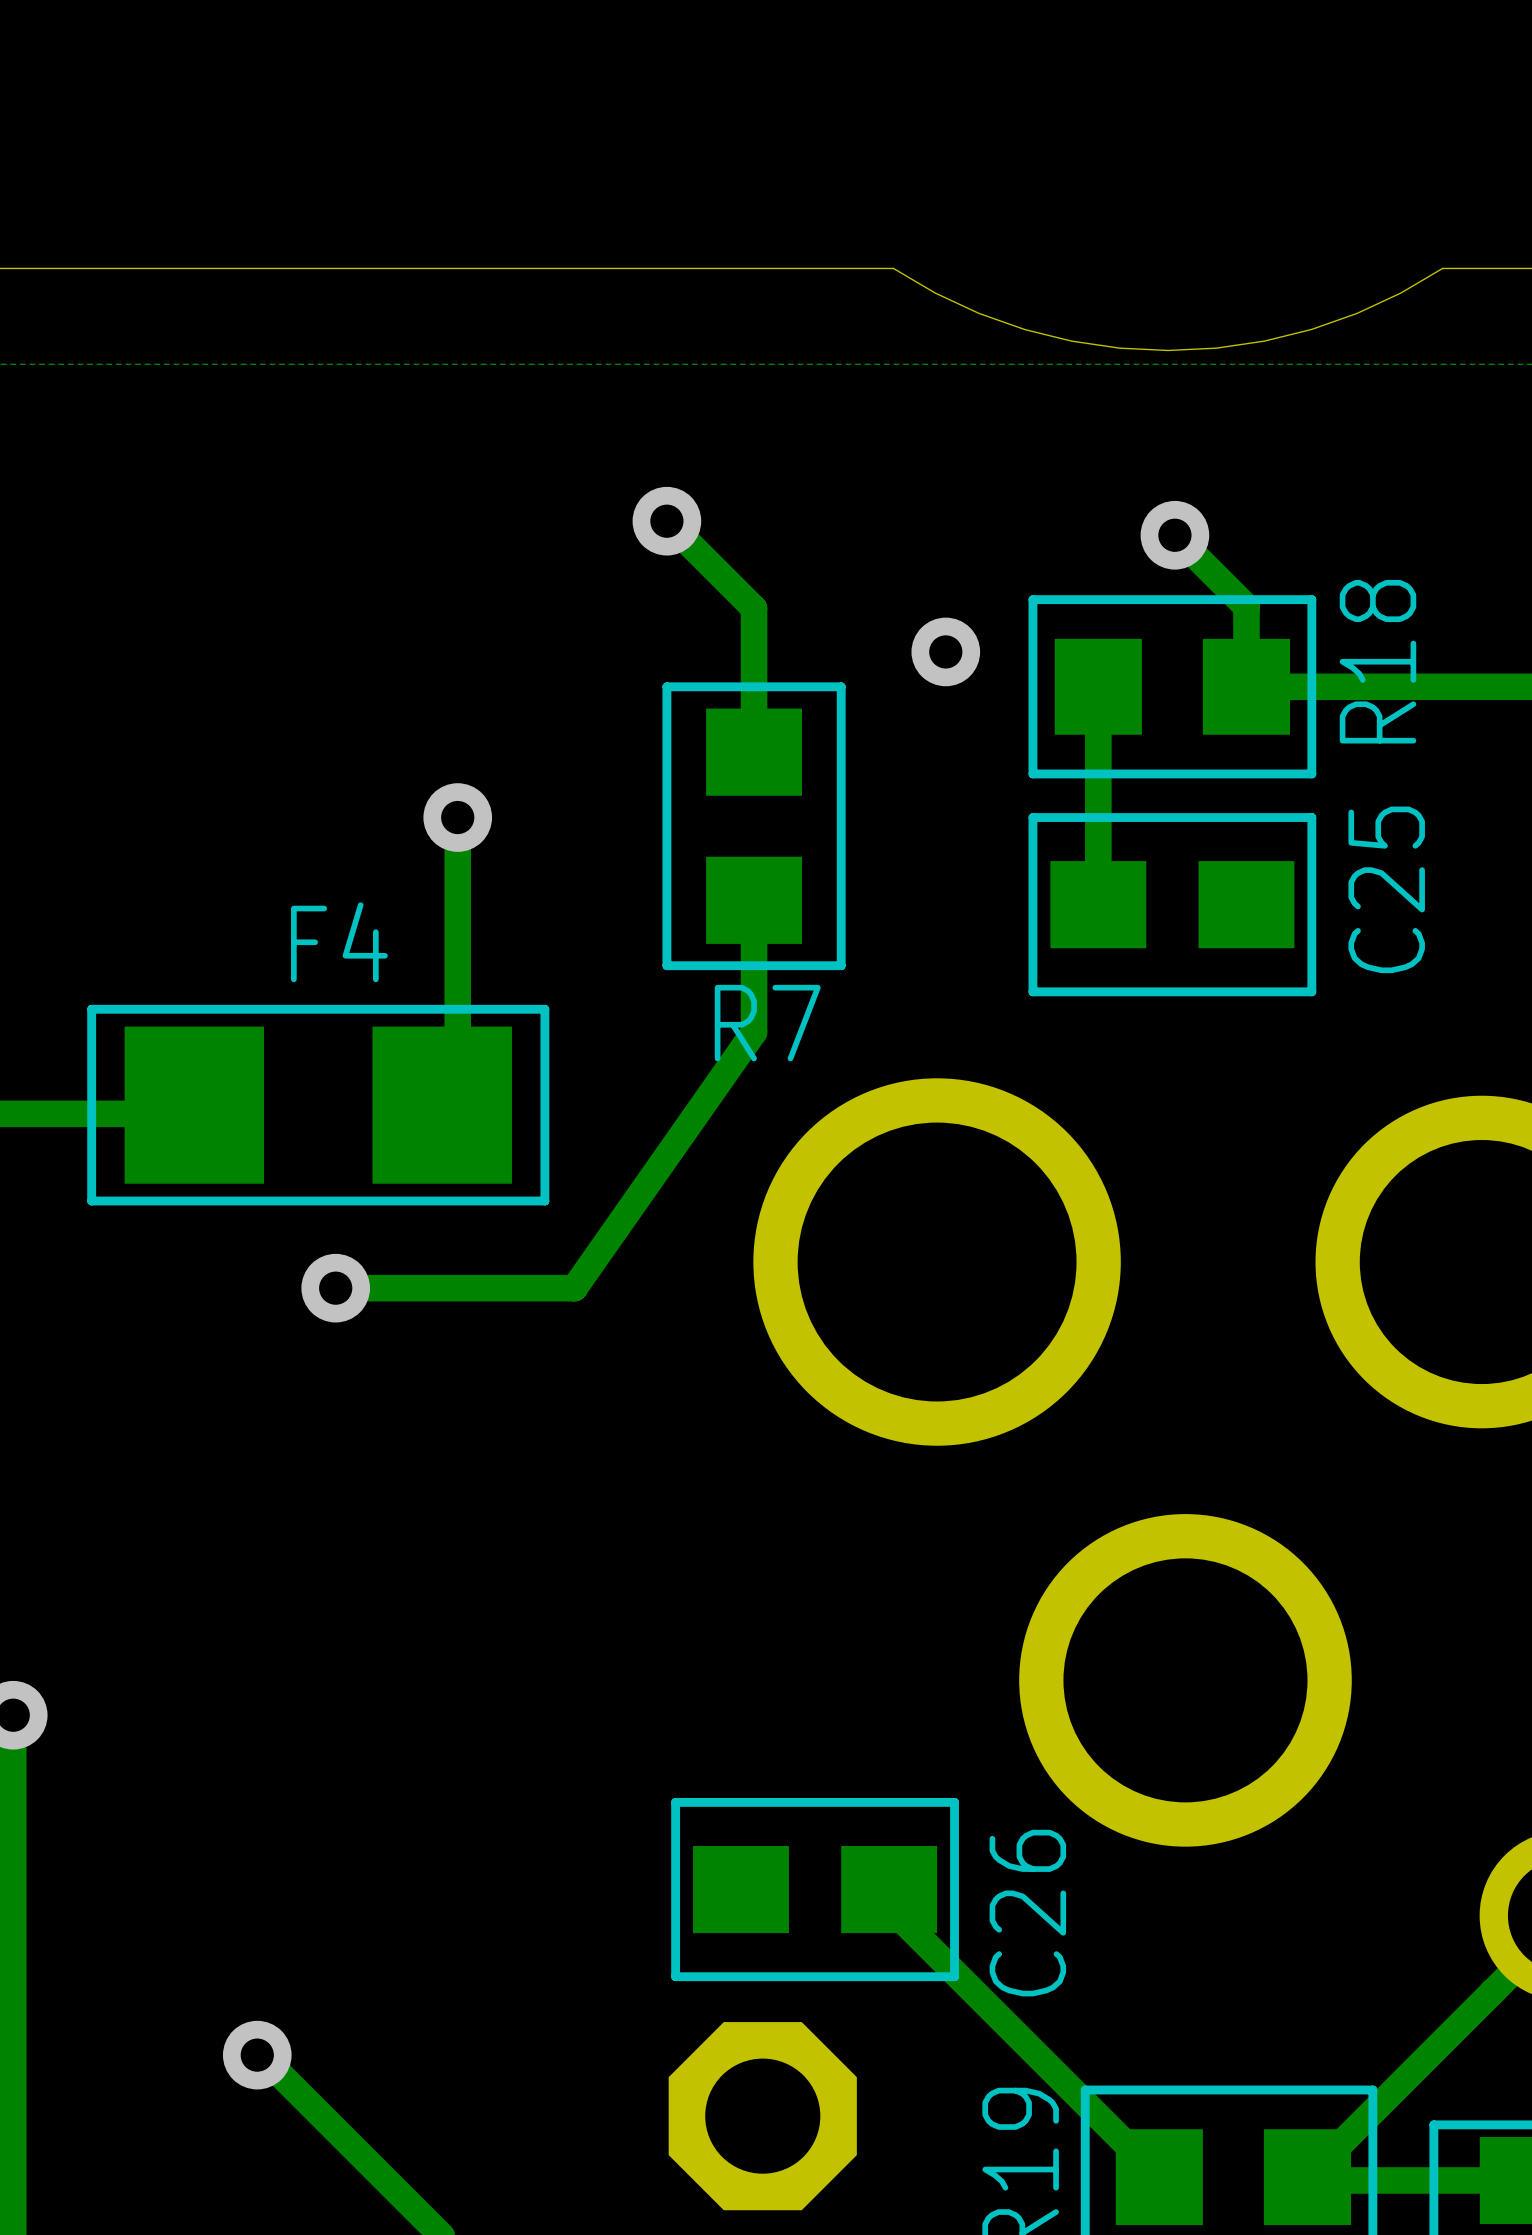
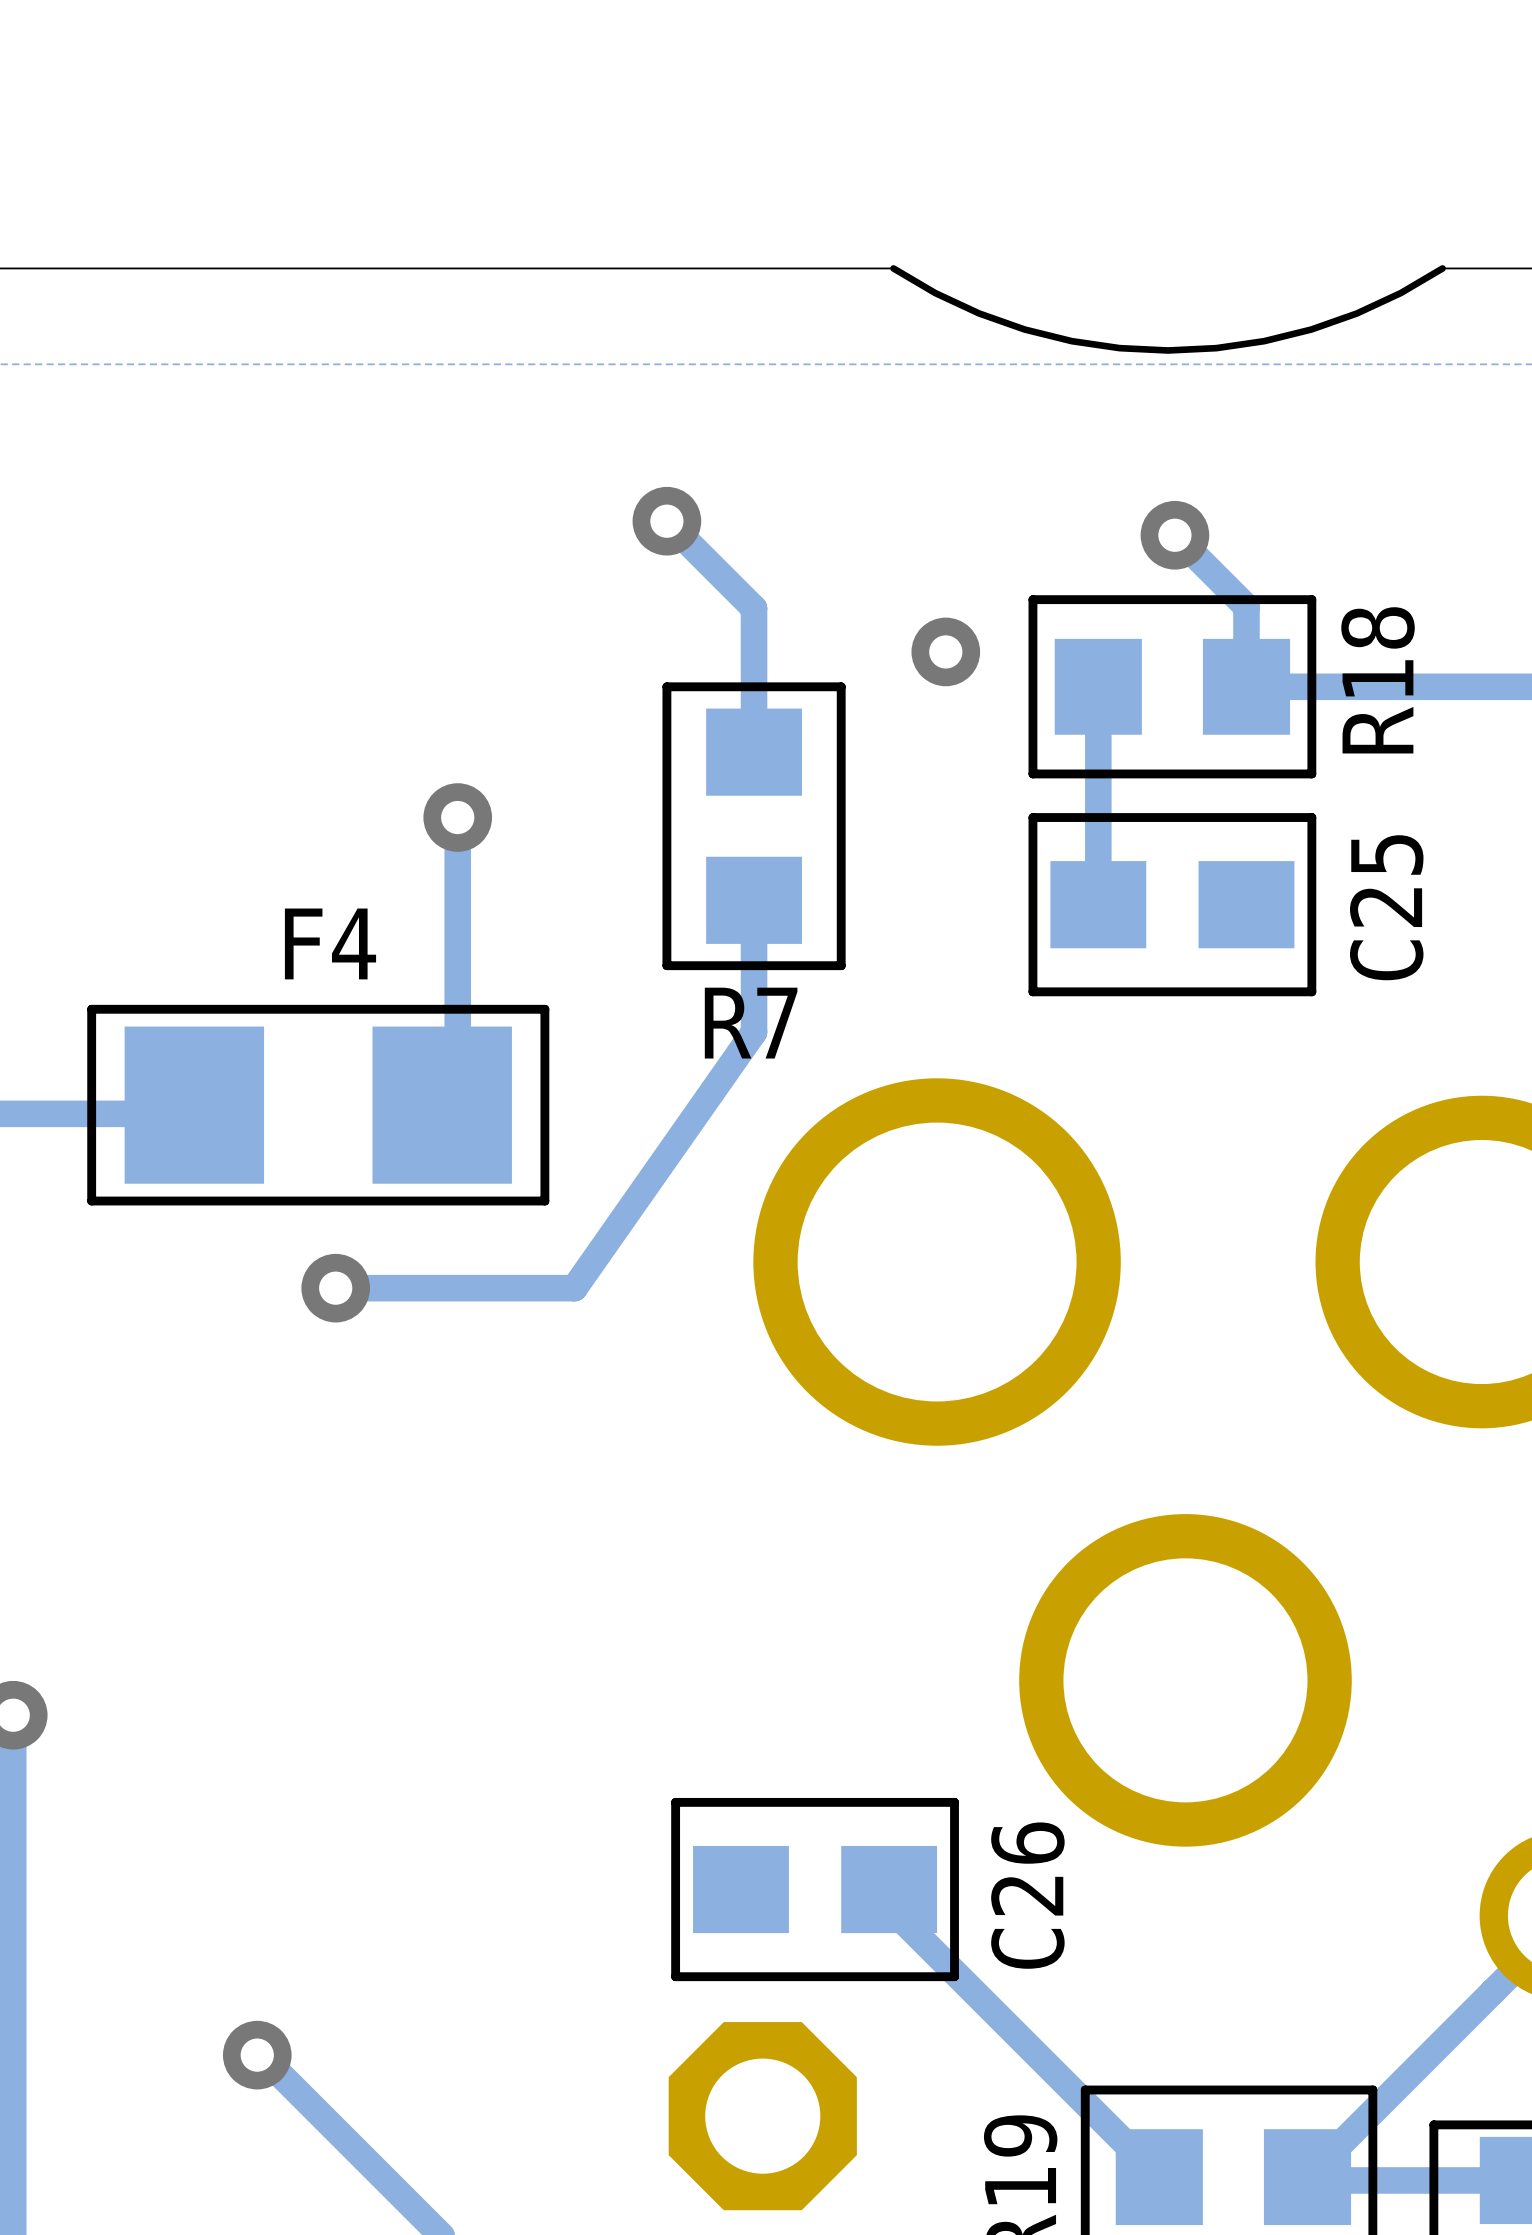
board edge width: thin (1442, 268) (1400, 293) (1356, 313) (1311, 329) (1264, 341) (1216, 348) (1168, 350) (1119, 348) (1071, 341) (1024, 329) (979, 313) (935, 293) (893, 268) -> thick (1442, 268) (1400, 293) (1356, 313) (1311, 329) (1264, 341) (1216, 348) (1168, 350) (1119, 348) (1071, 341) (1024, 329) (979, 313) (935, 293) (893, 268)

